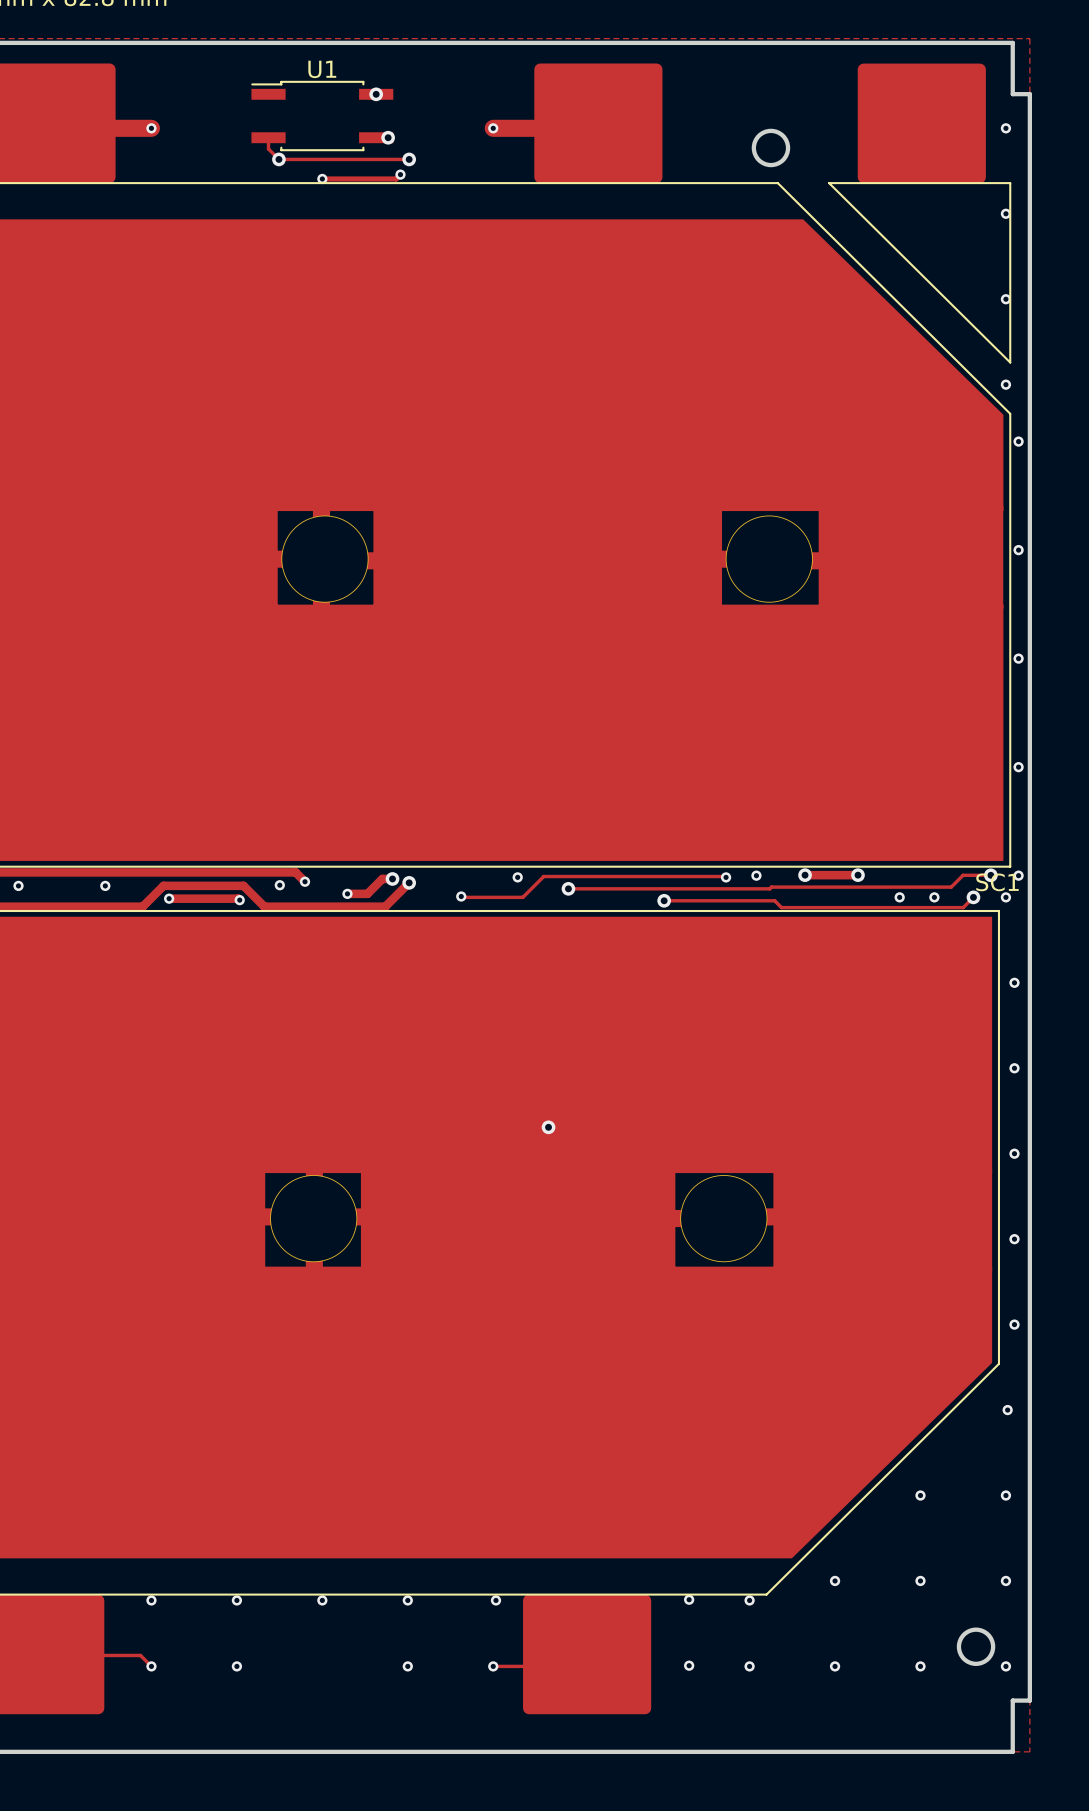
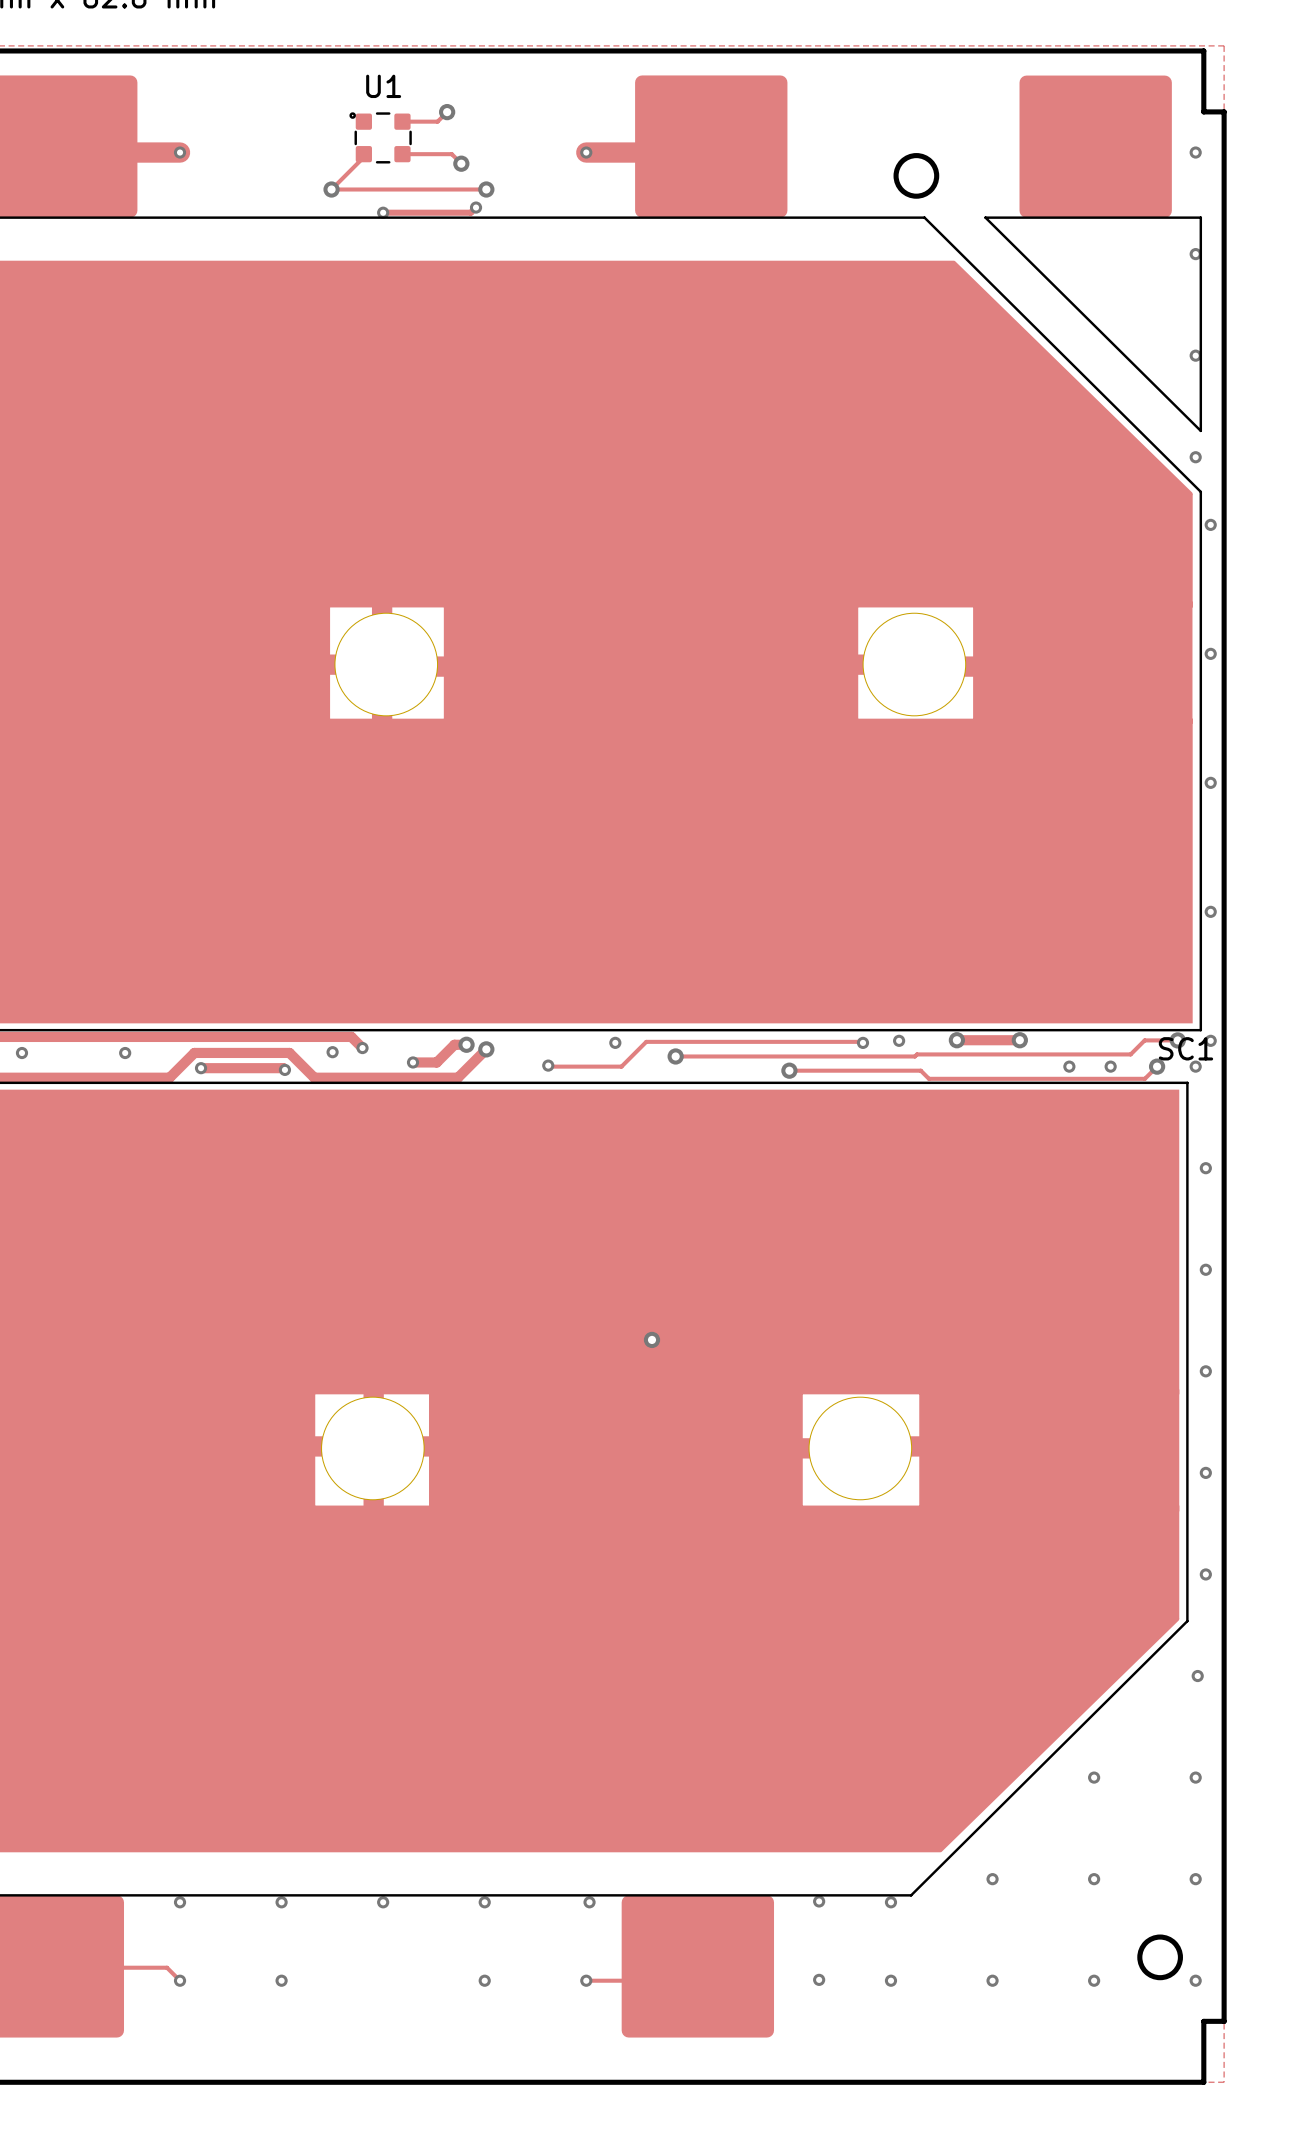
U1 footprint: [251, 80, 394, 152] -> [349, 112, 412, 164]
track: none -> (447, 112) (437, 121) (402, 121)
track: none -> (402, 154) (451, 154) (461, 163)
track: (268, 137) (268, 149) (278, 159) -> (363, 154) (363, 157) (331, 189)

